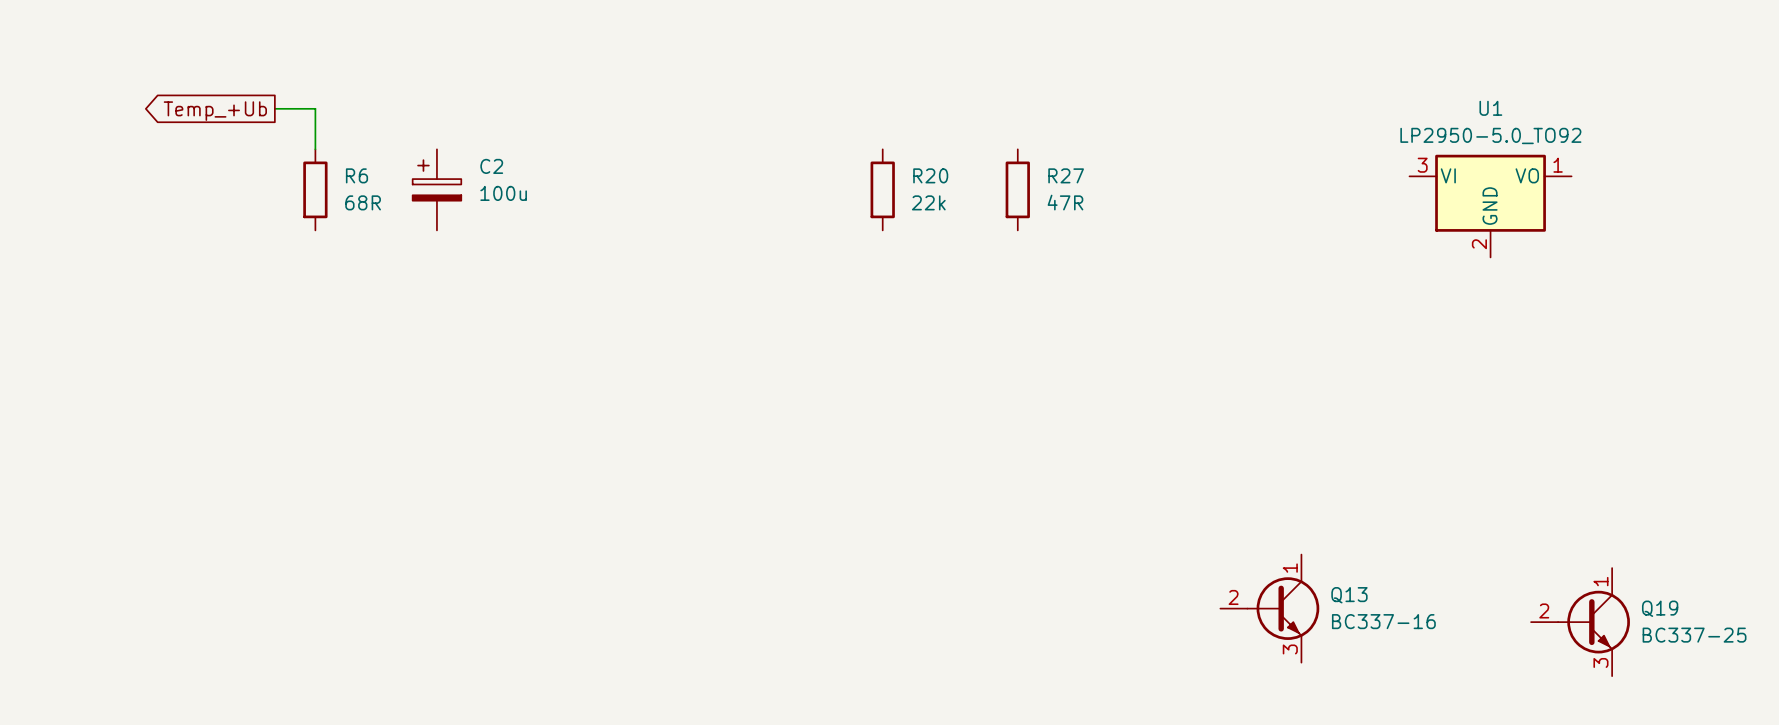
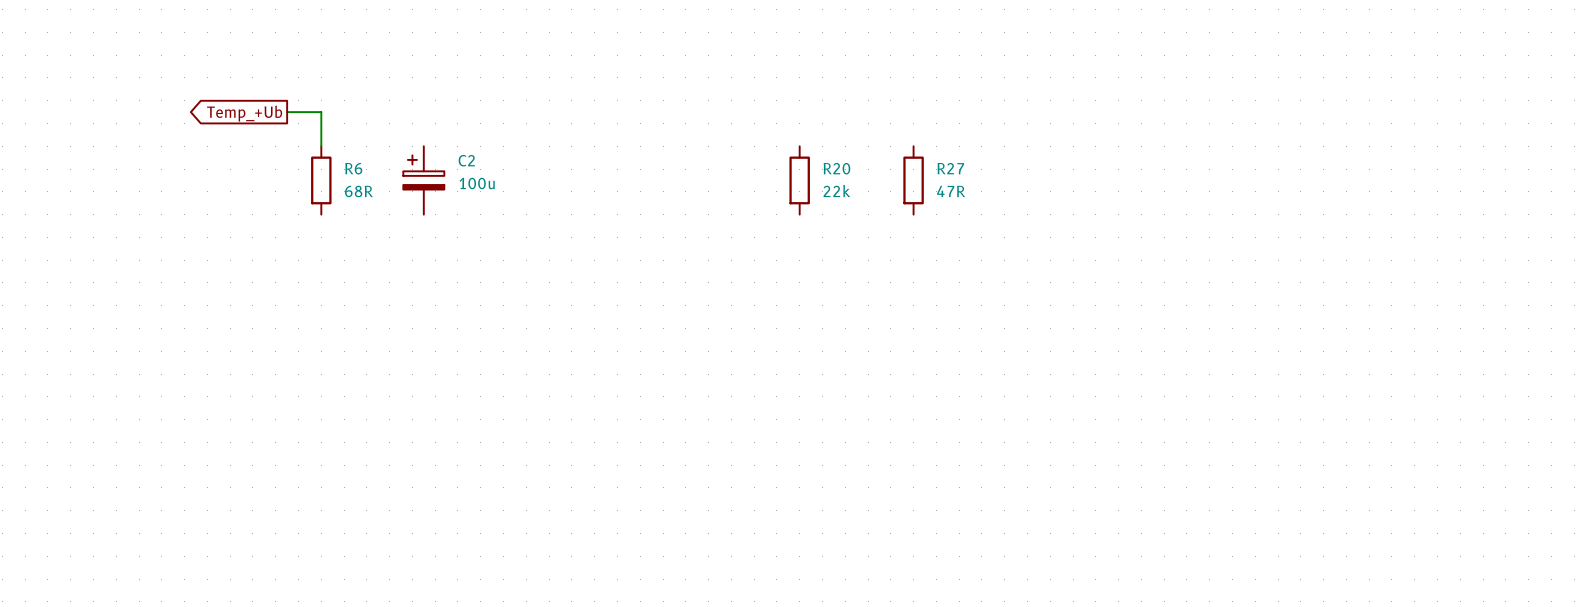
U1: LP2950-5.0_TO92 (1490, 206) -> none
Q13: BC337-16 (1269, 608) -> none
Q19: BC337-25 (1580, 622) -> none

